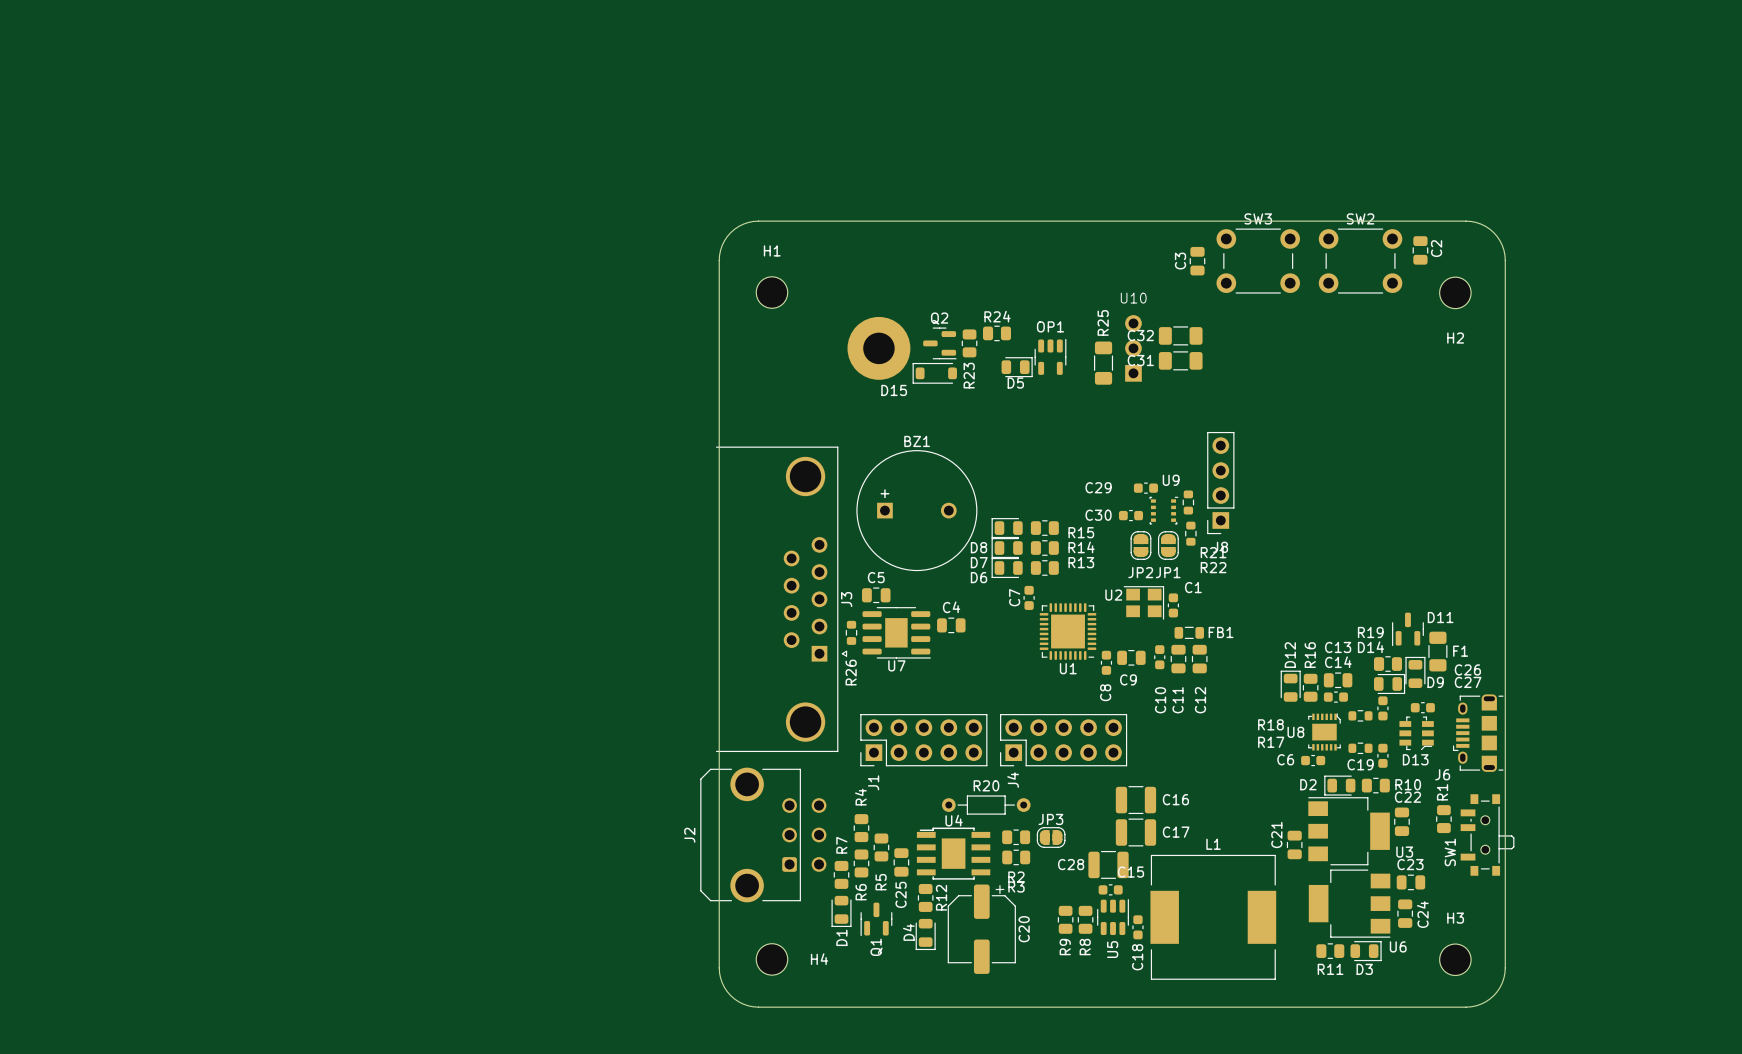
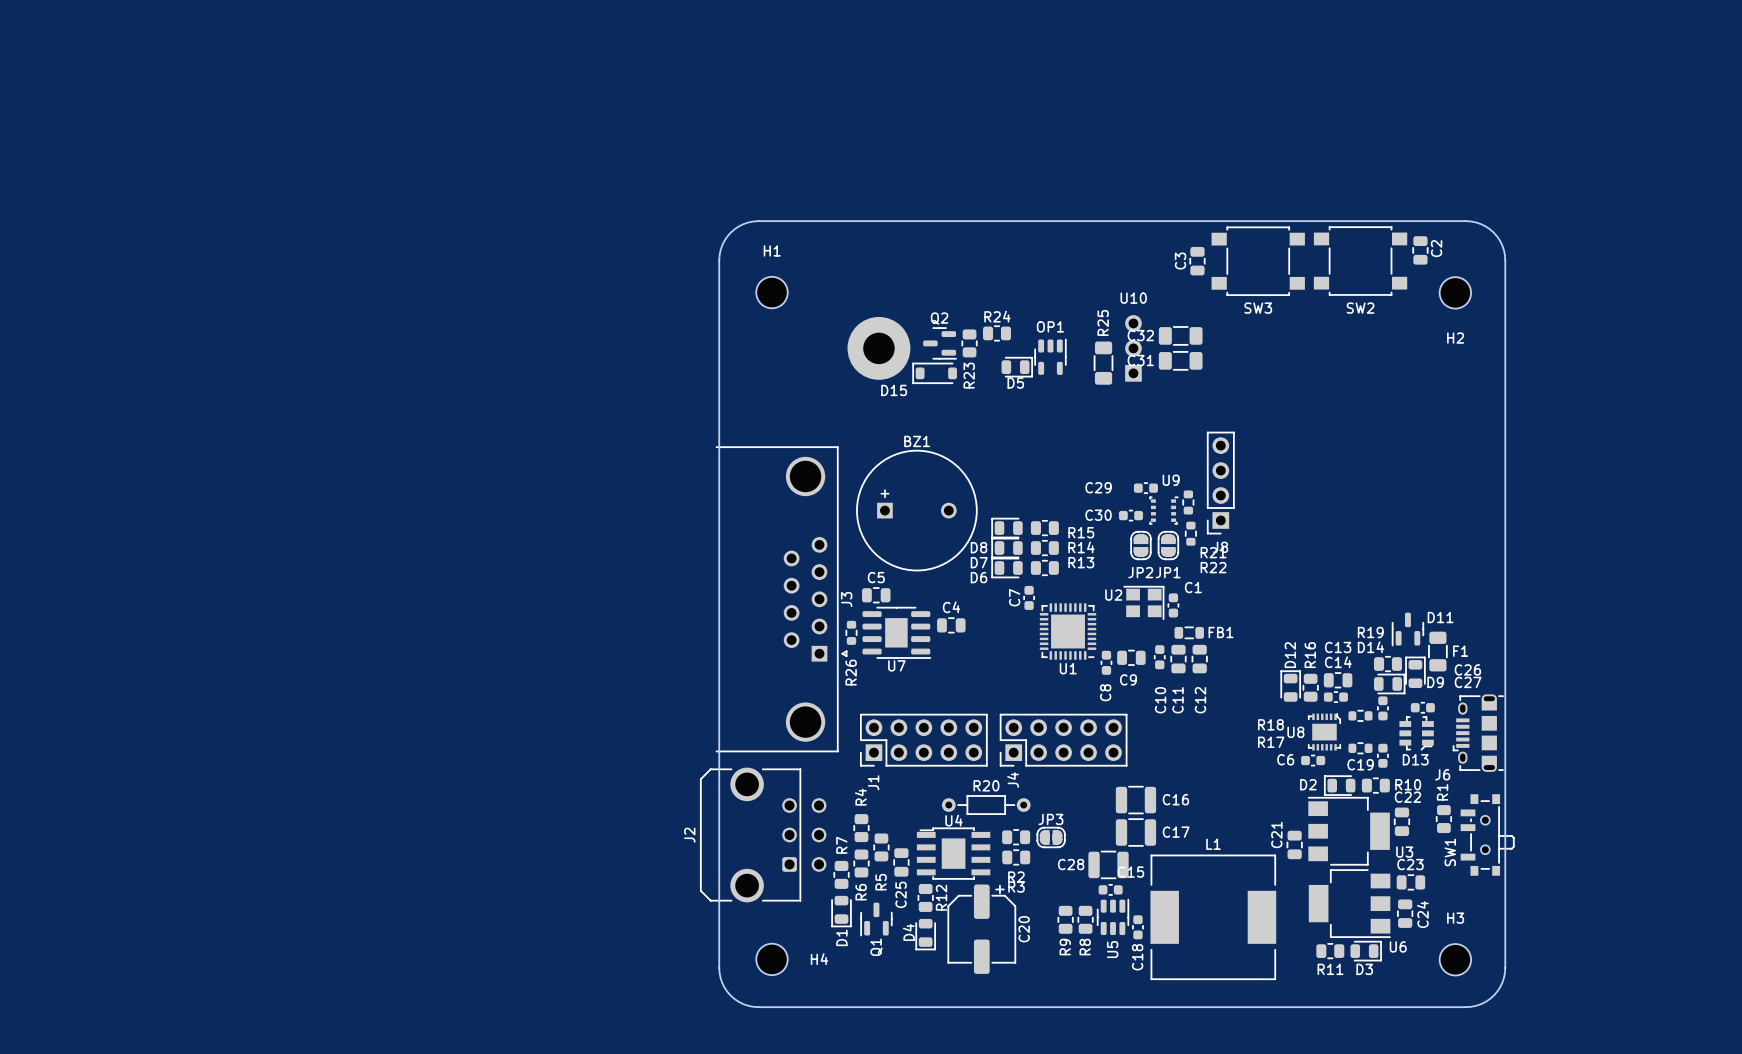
SW3 name position: SW3 (1258, 218) -> SW3 (1258, 308)
SW2 name position: SW2 (1360, 218) -> SW2 (1360, 308)
SW3 footprint: [1216, 228, 1300, 294] -> [1211, 226, 1305, 296]
SW2 footprint: [1318, 228, 1403, 294] -> [1313, 226, 1408, 296]

